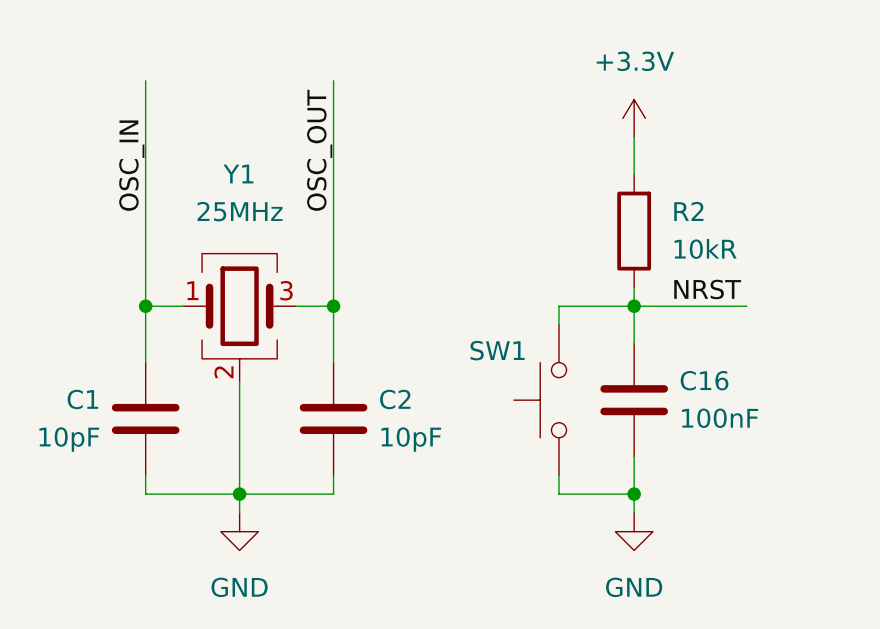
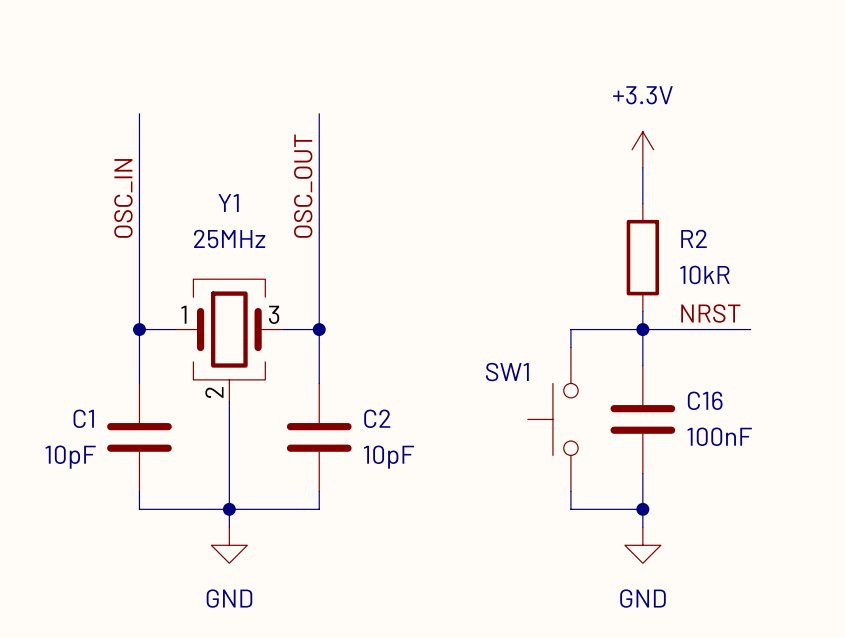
power symbol position: +3.3V (634, 118) -> +3.3V (642, 149)
wire: (634, 137) (634, 174) -> (642, 167) (642, 203)
R2 position: (634, 231) -> (642, 257)
wire: (634, 287) (634, 343) -> (642, 311) (642, 365)
label position: NRST (707, 289) -> NRST (710, 313)
wire: (596, 306) (559, 306) (559, 325) -> (570, 329) (570, 347)
junction position: (634, 306) -> (642, 329)
wire: none -> (714, 329) (750, 329)
SW1 position: (540, 400) -> (552, 419)
C16 position: (634, 400) -> (642, 419)
wire: (634, 456) (634, 512) -> (642, 473) (642, 527)
wire: (559, 475) (559, 494) (596, 494) -> (570, 491) (570, 509)
wire: none -> (606, 509) (642, 509)
junction position: (634, 494) -> (642, 509)
power symbol position: GND (634, 531) -> GND (642, 545)

